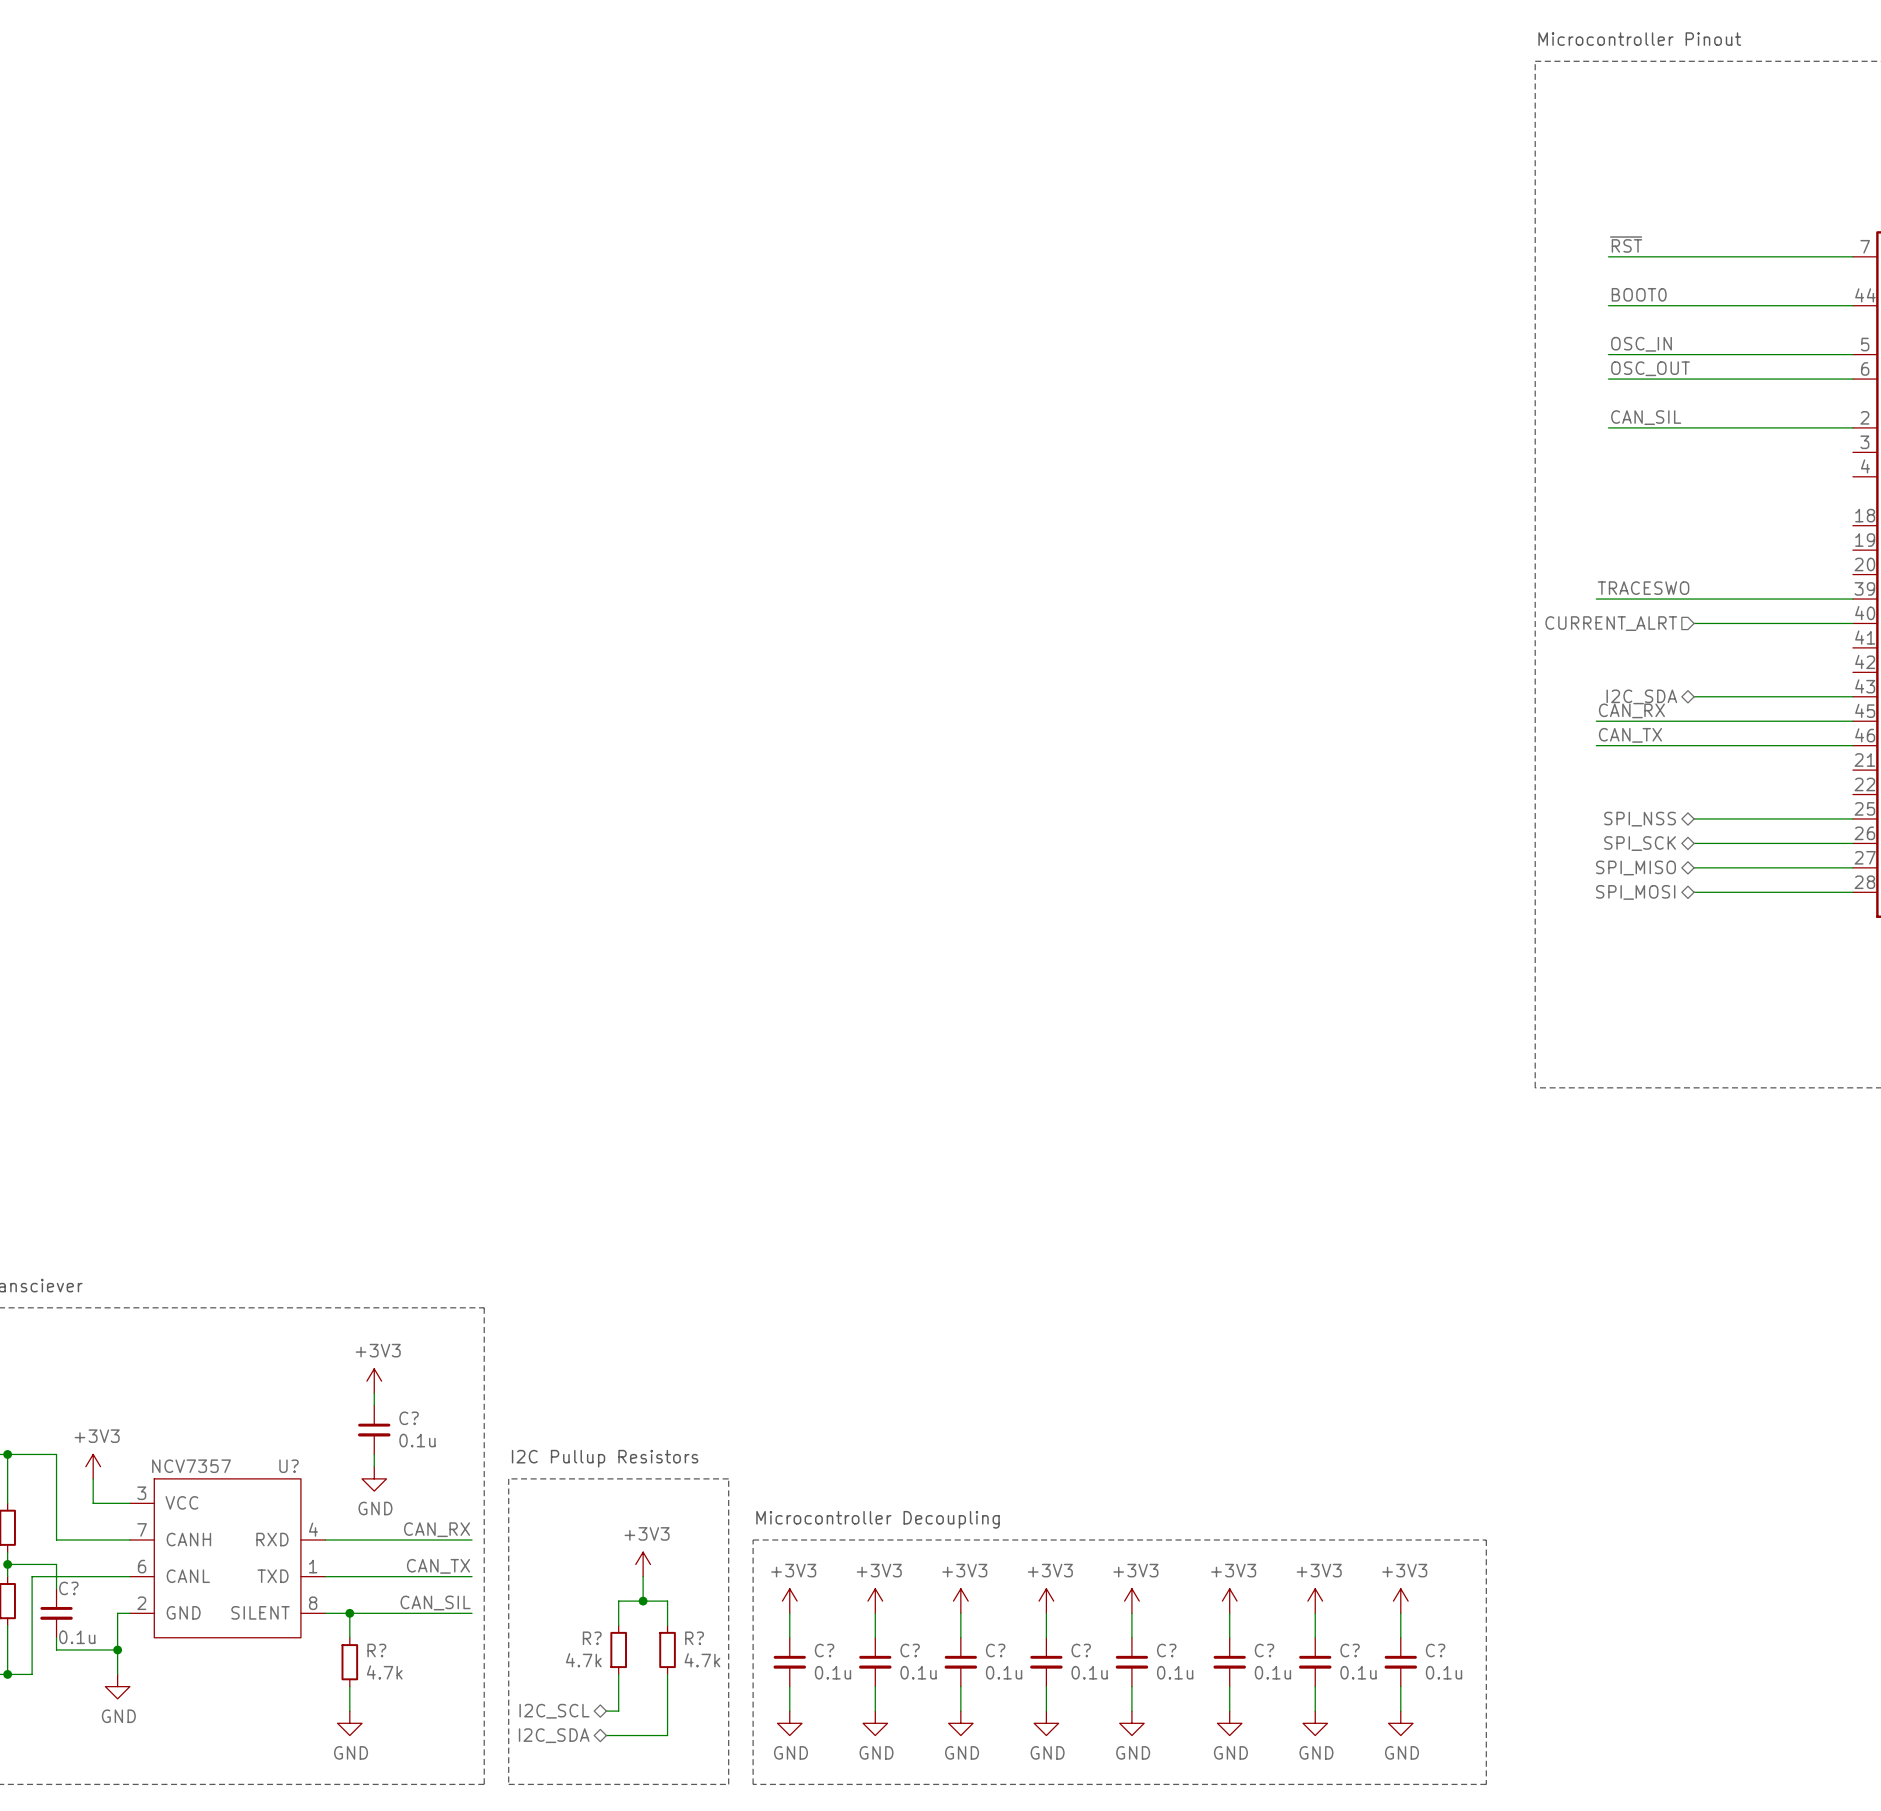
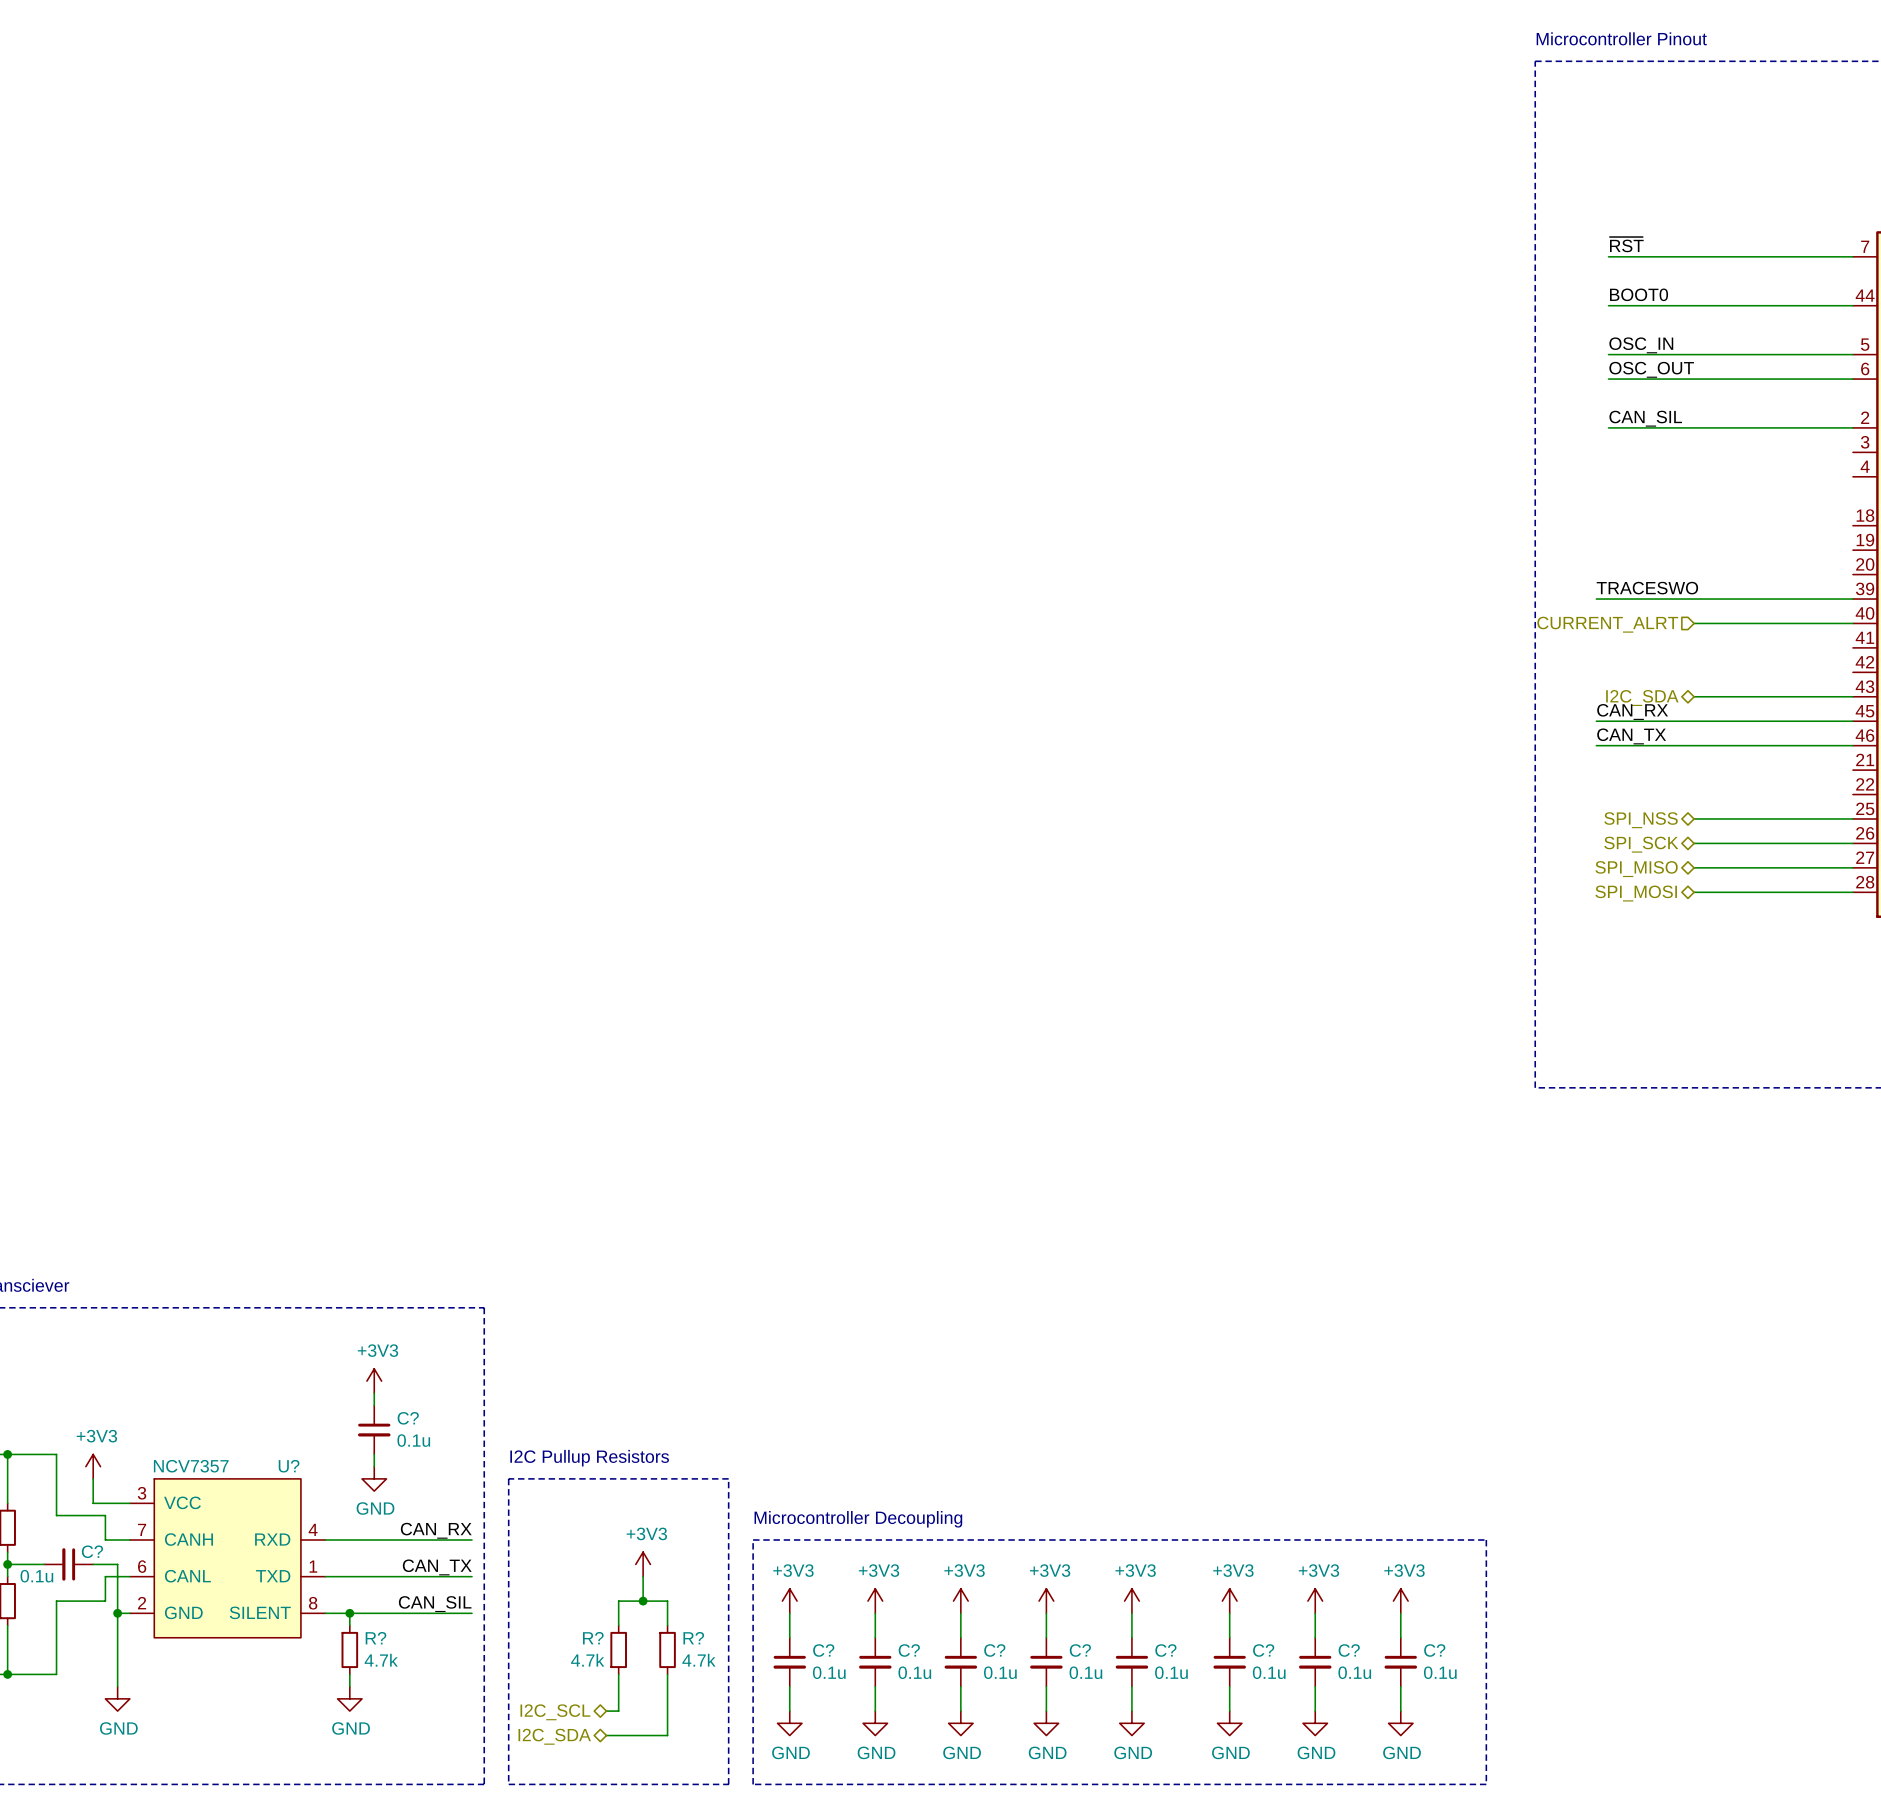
wire: (56, 1515) (56, 1540) (105, 1540) -> (56, 1515) (105, 1515) (105, 1540)
wire: (44, 1564) (56, 1564) (56, 1588) -> none
wire: none -> (93, 1564) (117, 1564) (117, 1613)
wire: (105, 1576) (32, 1576) (32, 1674) -> (105, 1576) (105, 1601) (56, 1601) (56, 1637)
C? rotation: 0° (56, 1613) -> 90° clockwise (68, 1564)
C? position: (56, 1613) -> (68, 1564)
wire: (56, 1649) (117, 1649) -> (56, 1649) (56, 1674) (32, 1674)
junction position: (117, 1649) -> (117, 1613)
R? position: (349, 1662) -> (349, 1649)
power symbol position: GND (117, 1686) -> GND (117, 1698)
power symbol position: GND (349, 1723) -> GND (349, 1698)

